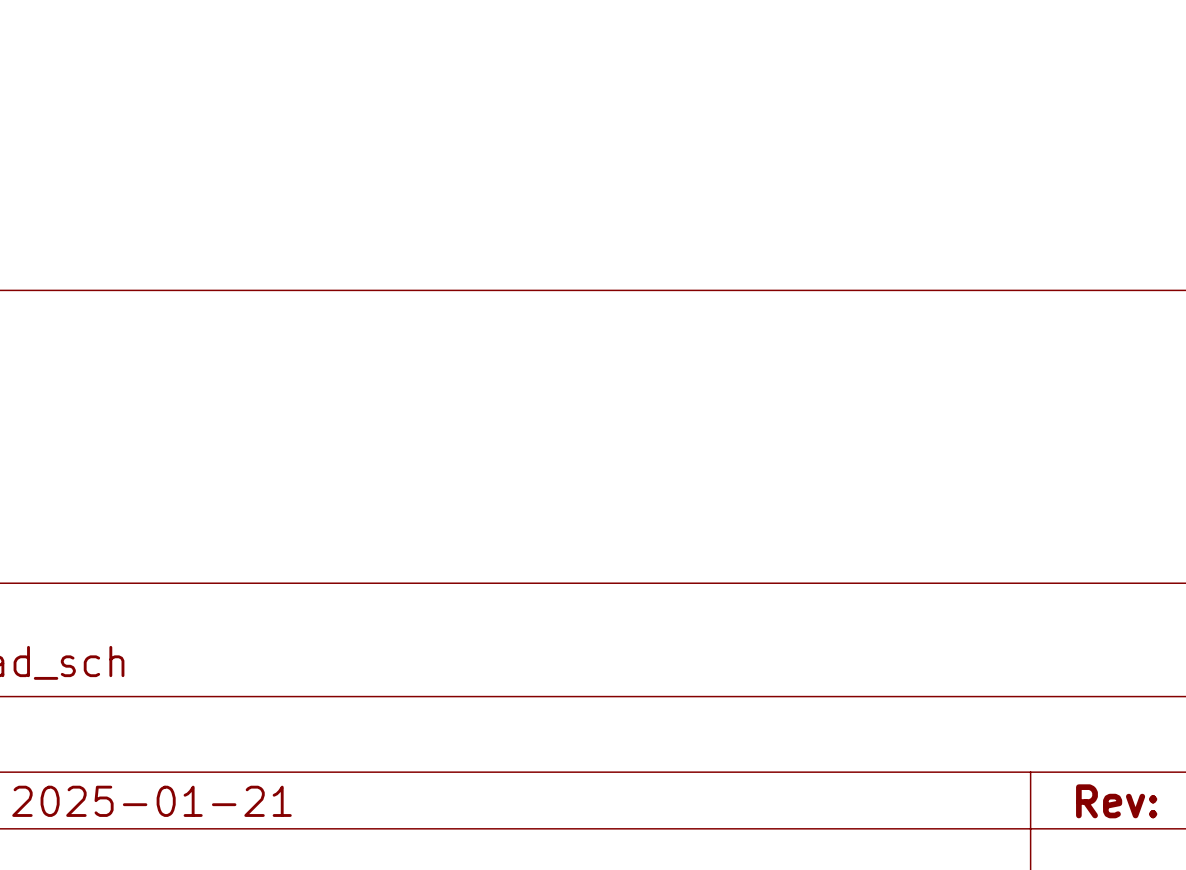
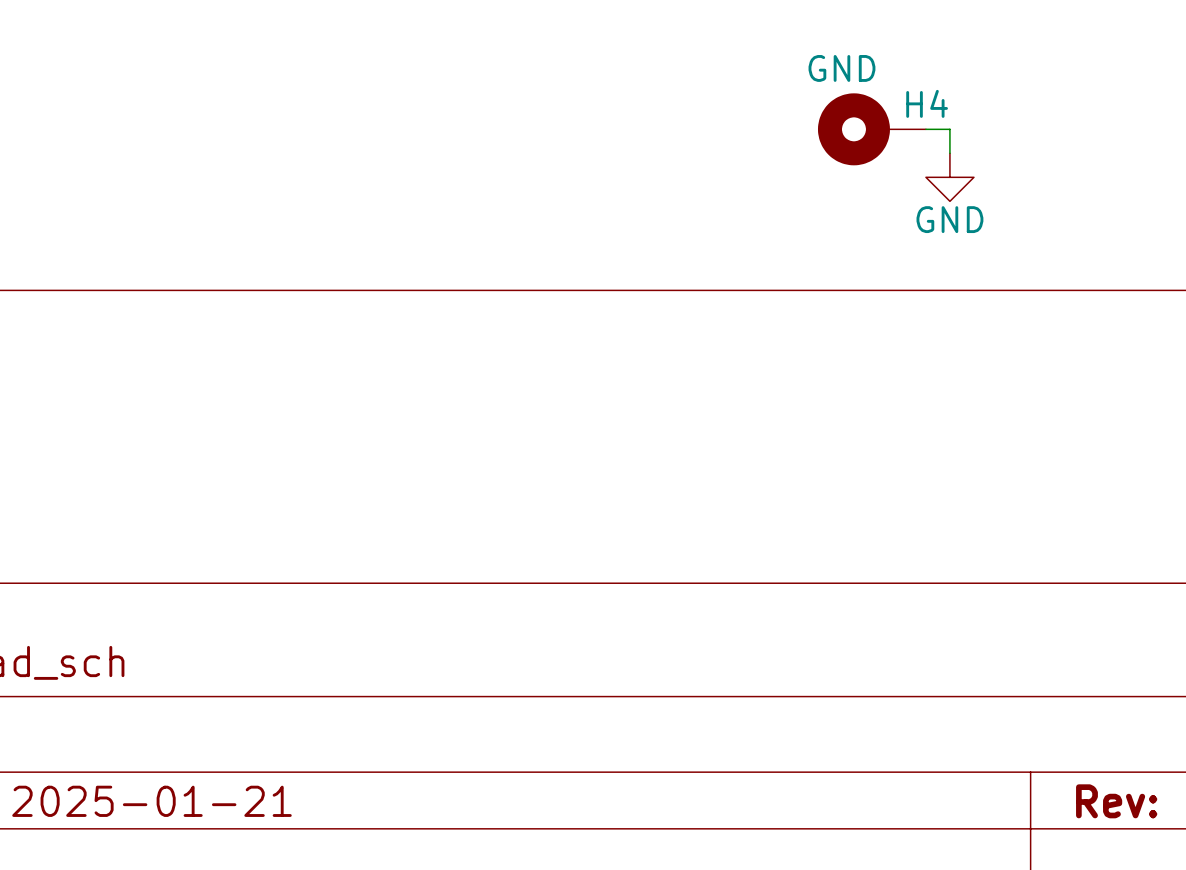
H4: none -> GND (871, 129)
wire: none -> (925, 129) (949, 129) (949, 153)
power symbol: none -> GND (949, 177)

